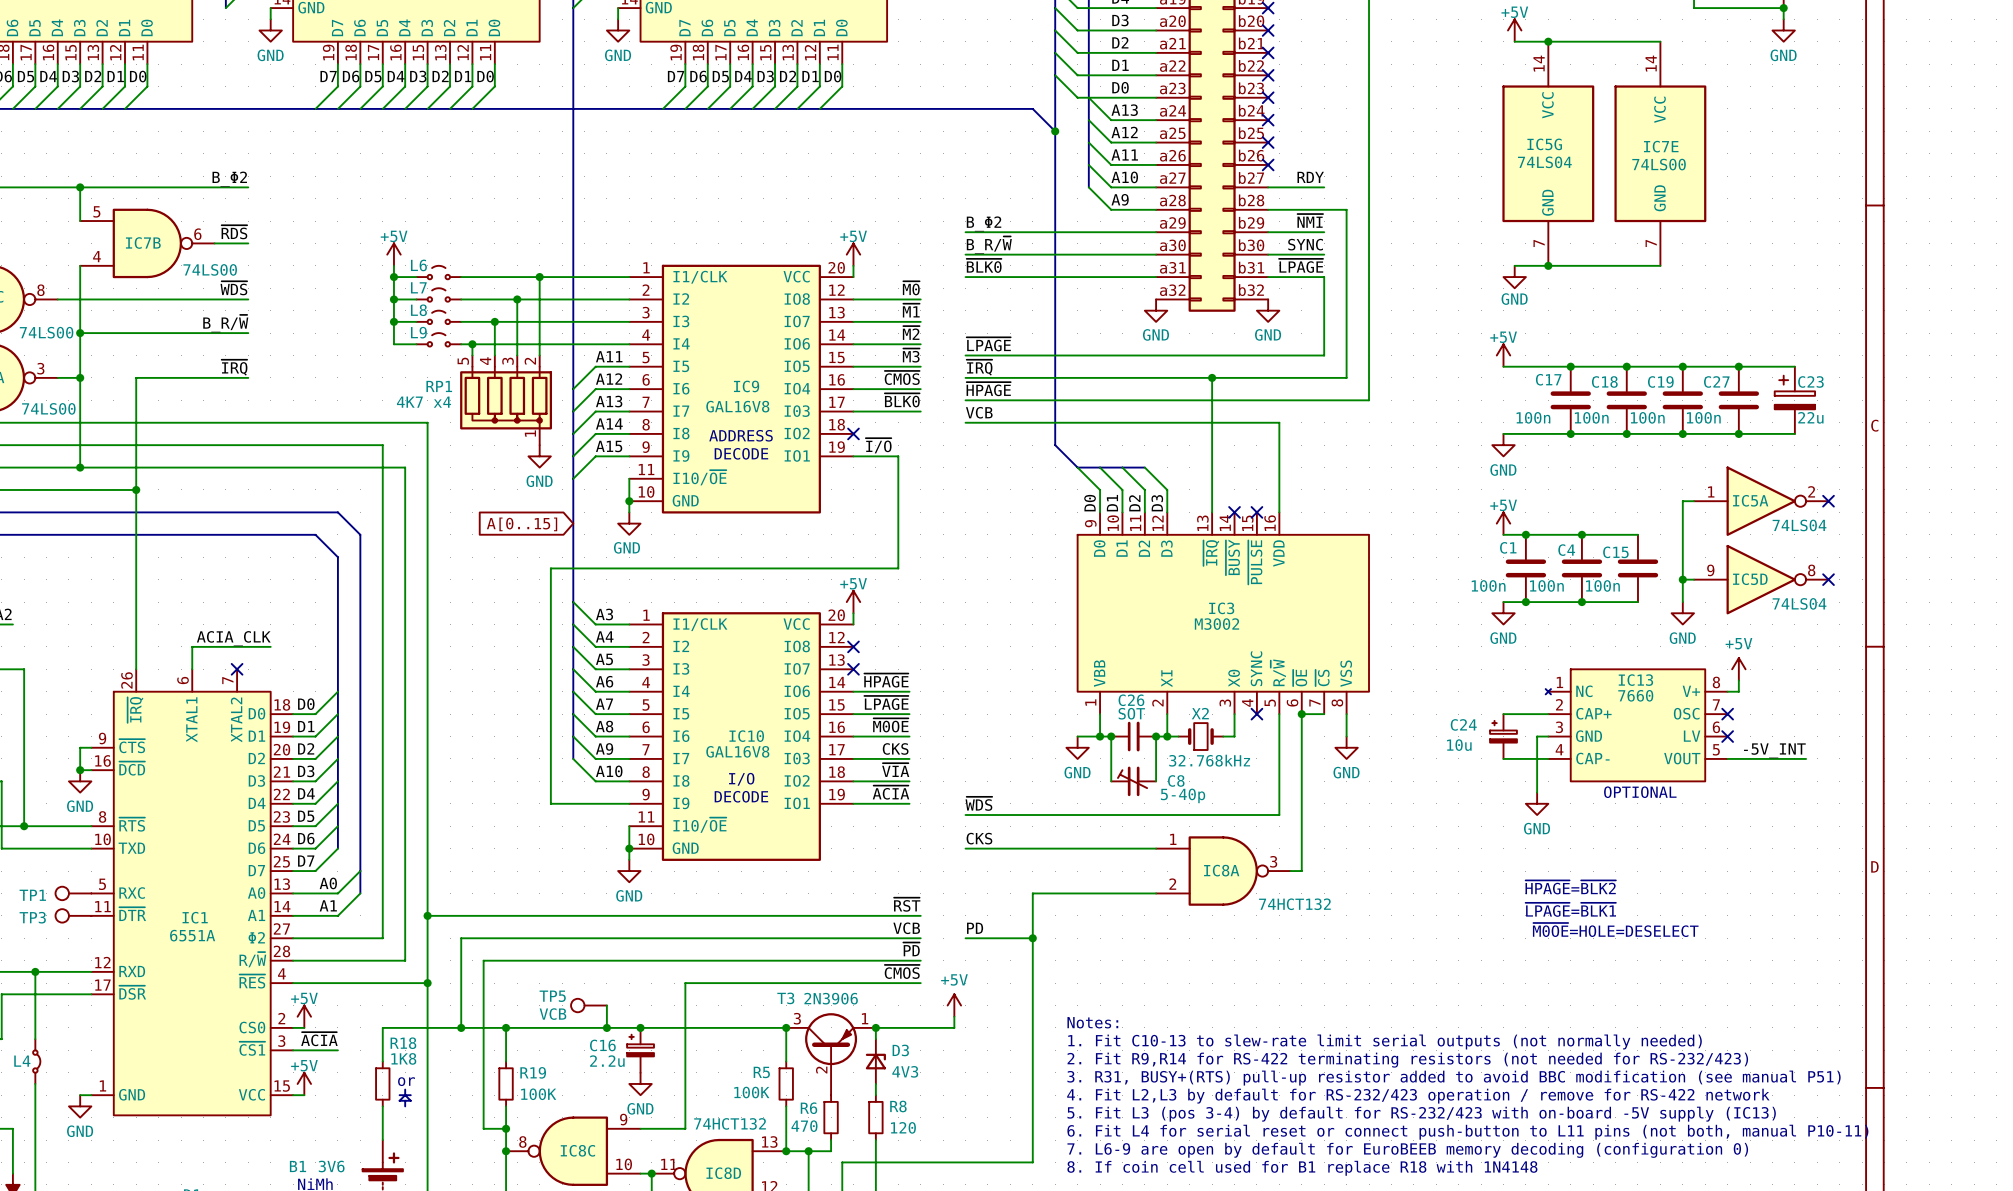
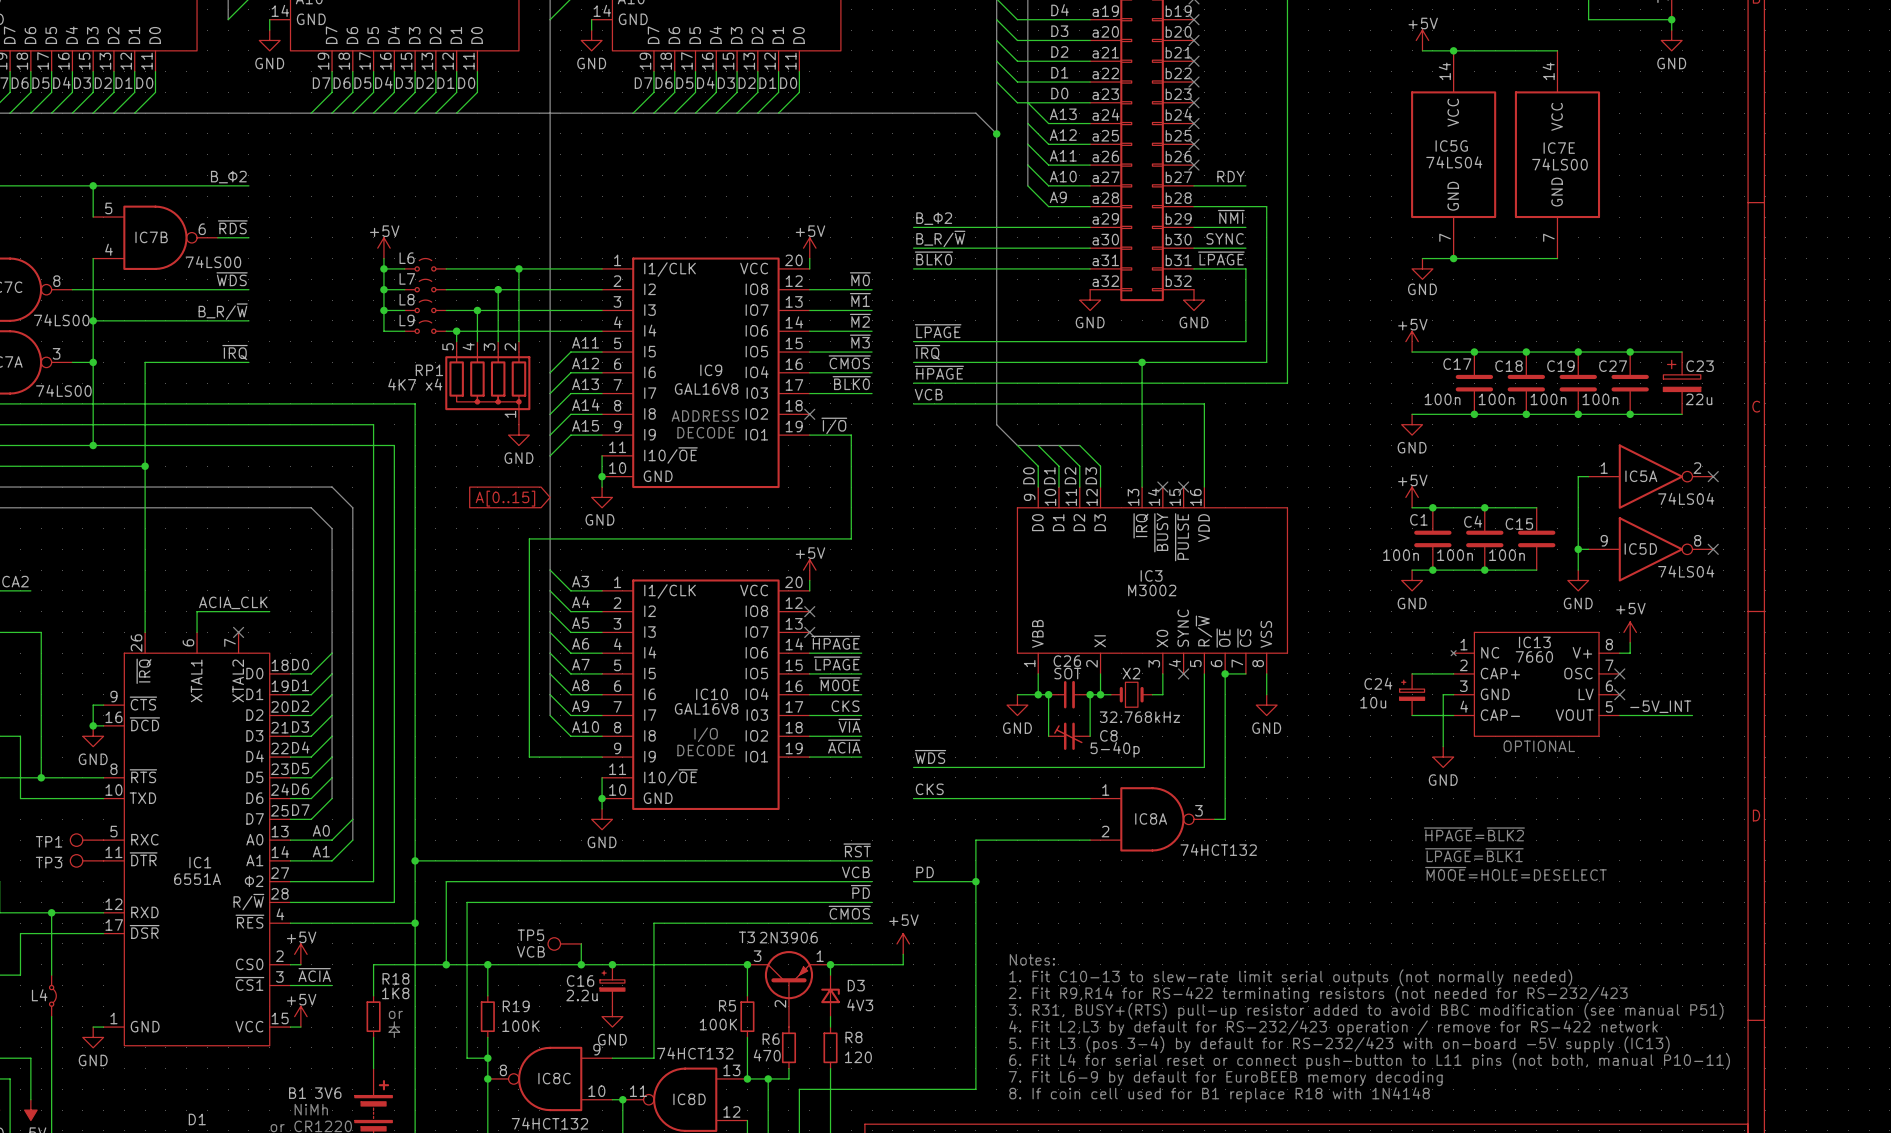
text: 2. Fit R9,R14 for RS-422 terminating resistors (not needed for RS-232/423) (1407, 1060) -> 2. Fit R9,R14 for RS-422 terminating resistors (not needed for RS-232/423 (1318, 994)
text: 7. L6-9 are open by default for EuroBEEB memory decoding (configuration 0) (1407, 1150) -> 7. Fit L6-9 by default for EuroBEEB memory decoding (1225, 1078)

